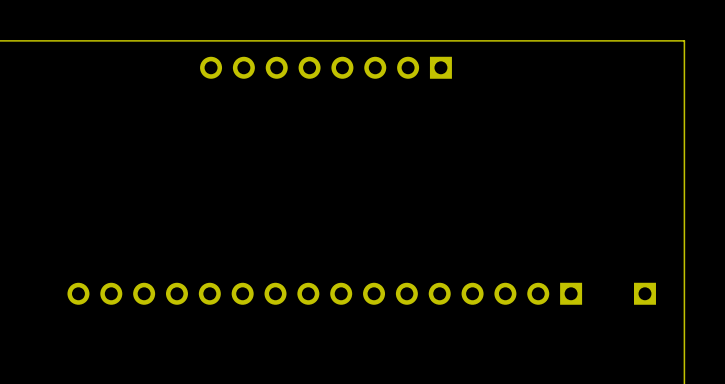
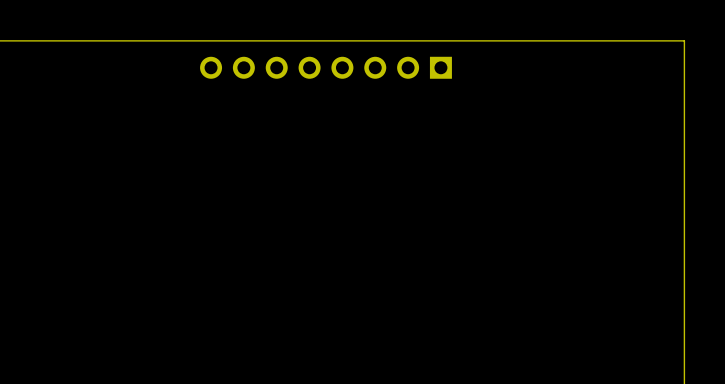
part: (324, 293) -> none
part: (644, 293) -> none

